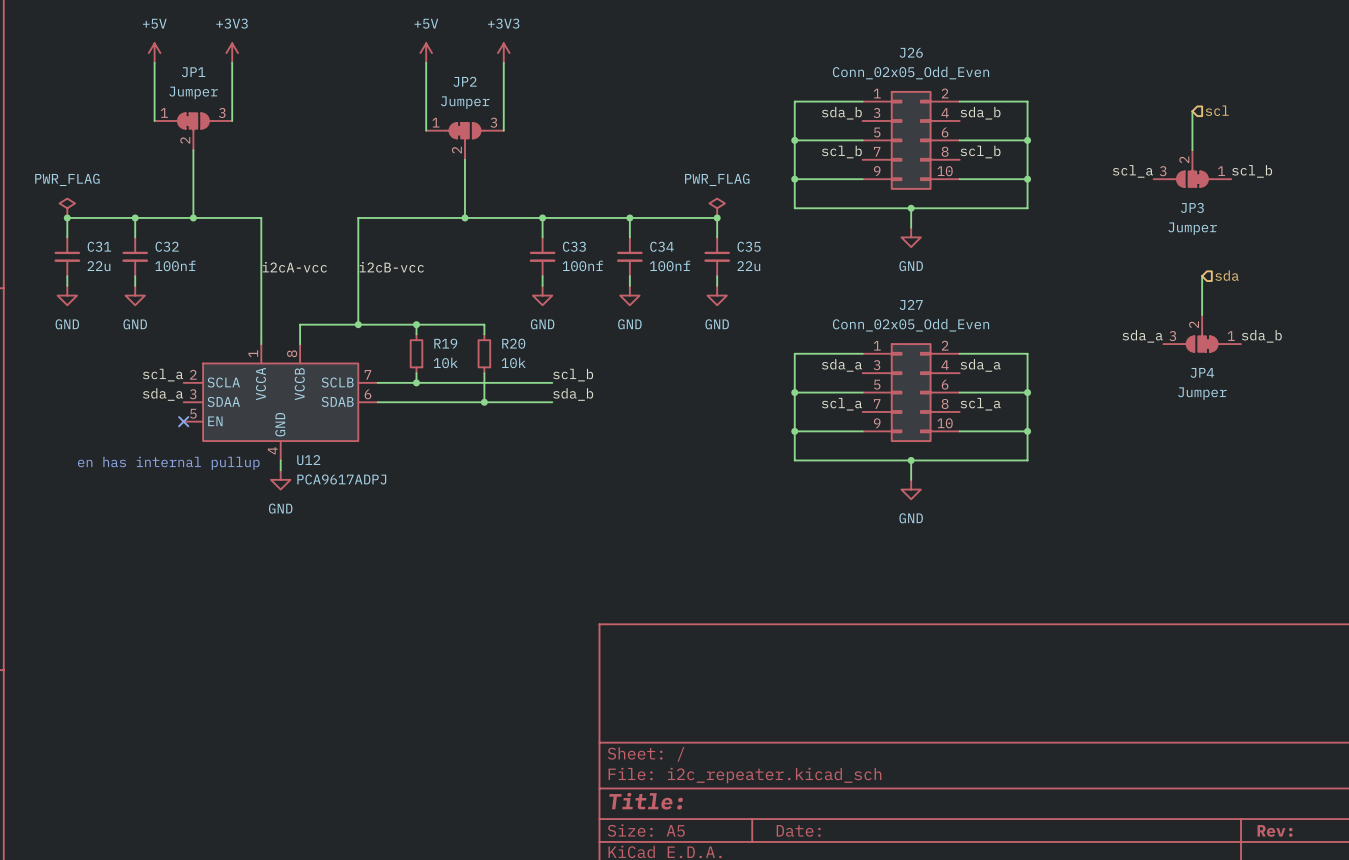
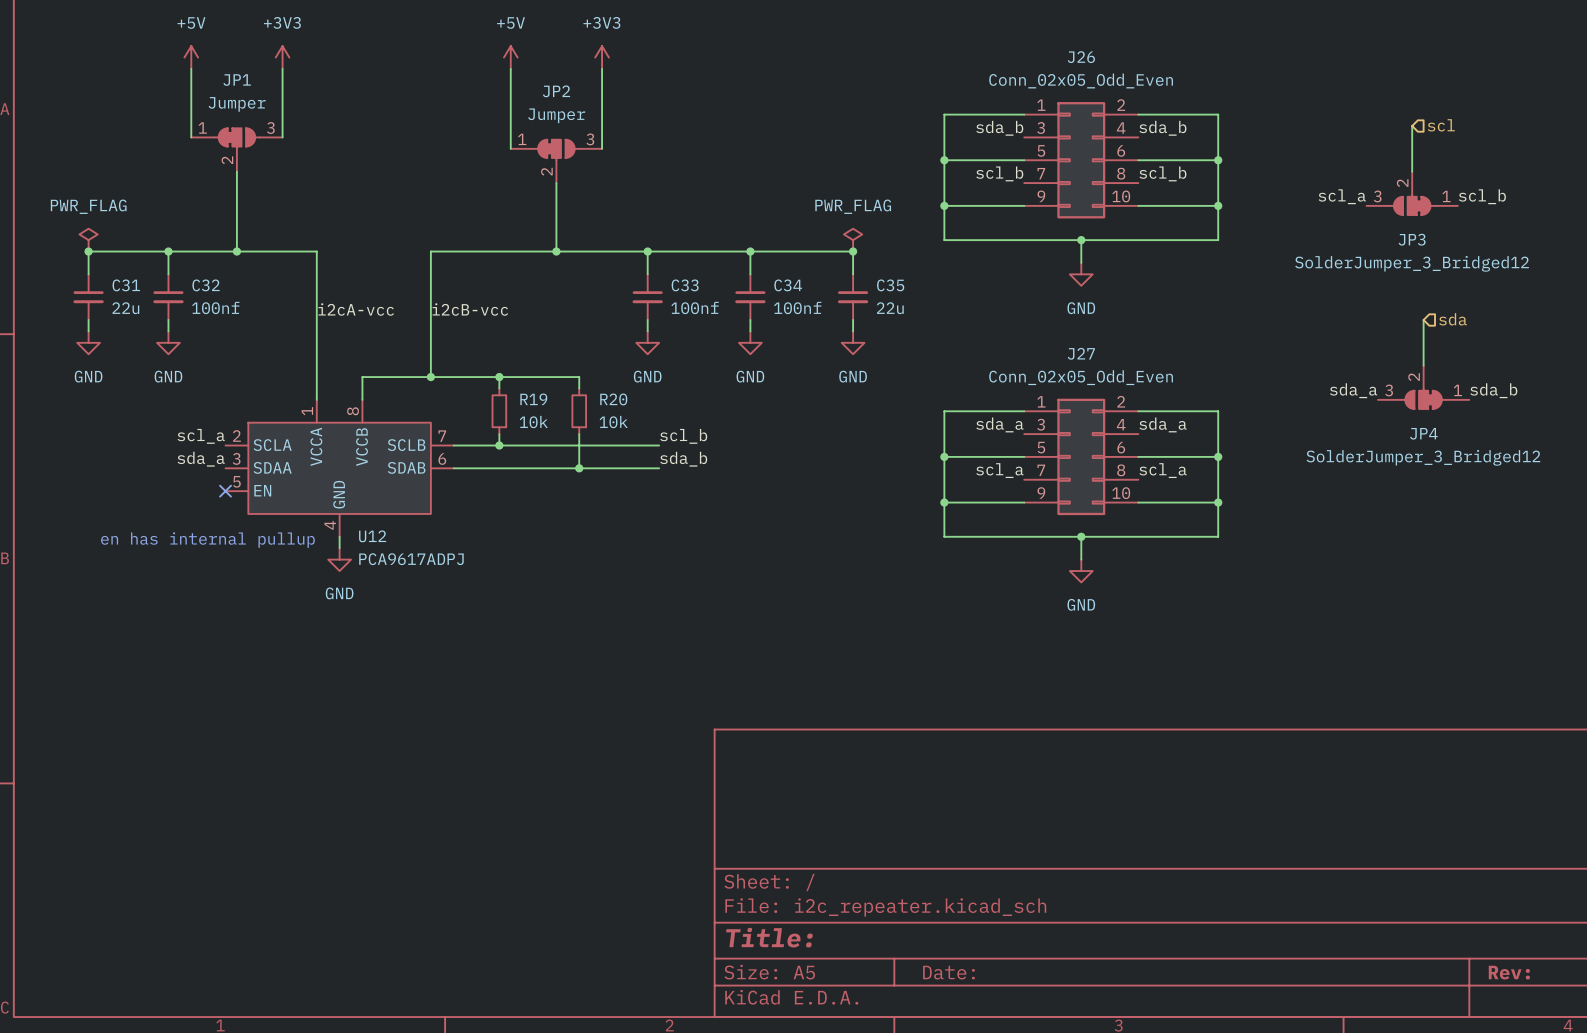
JP3 value: Jumper (1192, 228) -> SolderJumper_3_Bridged12 (1412, 263)
JP4 value: Jumper (1202, 393) -> SolderJumper_3_Bridged12 (1423, 457)

